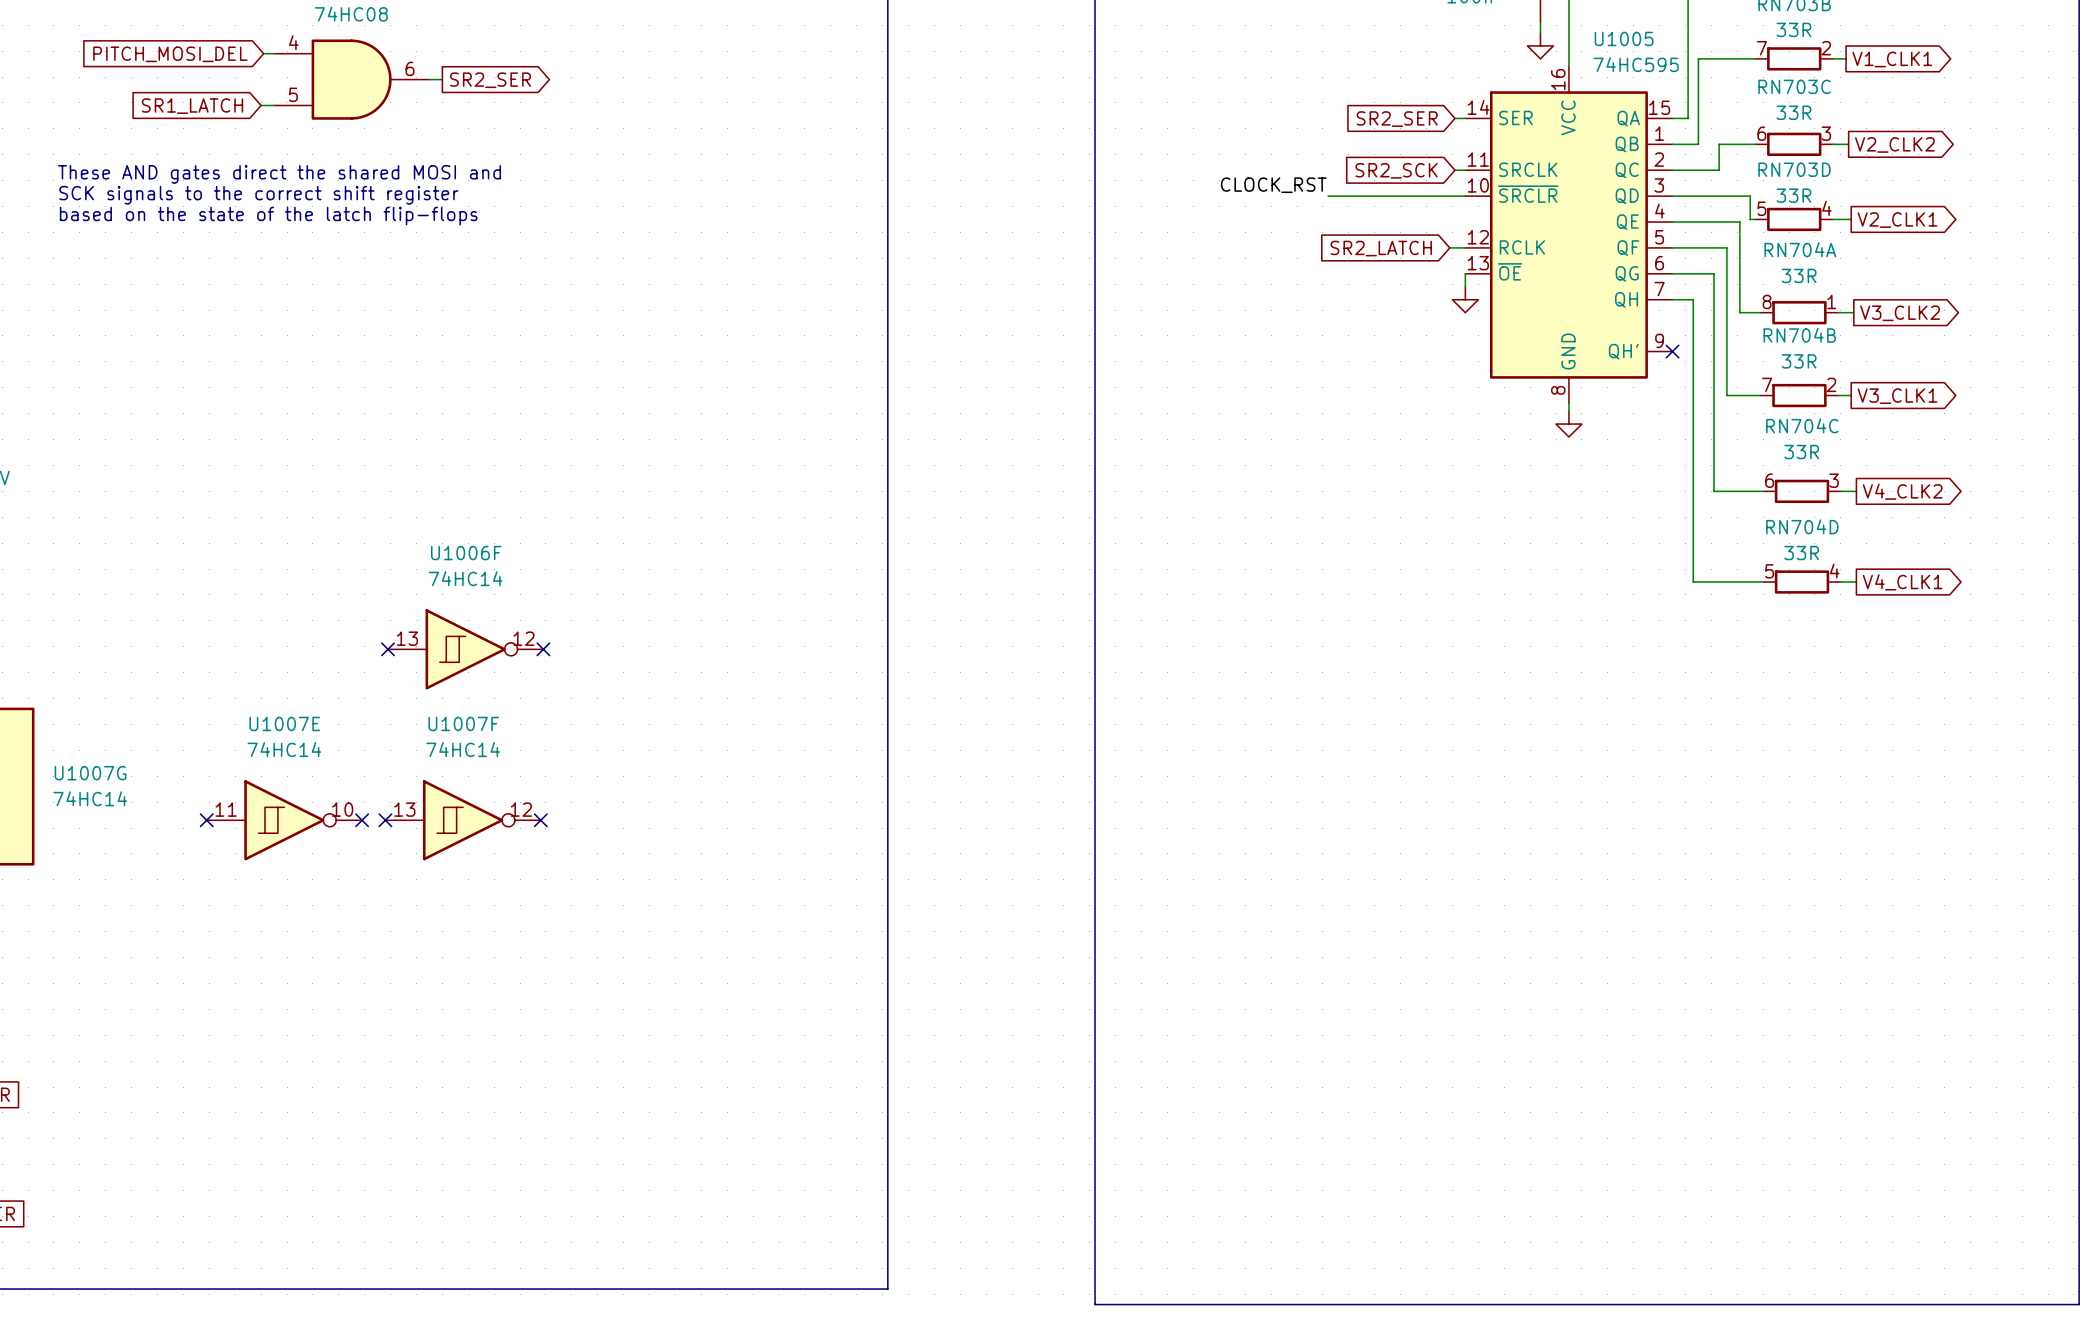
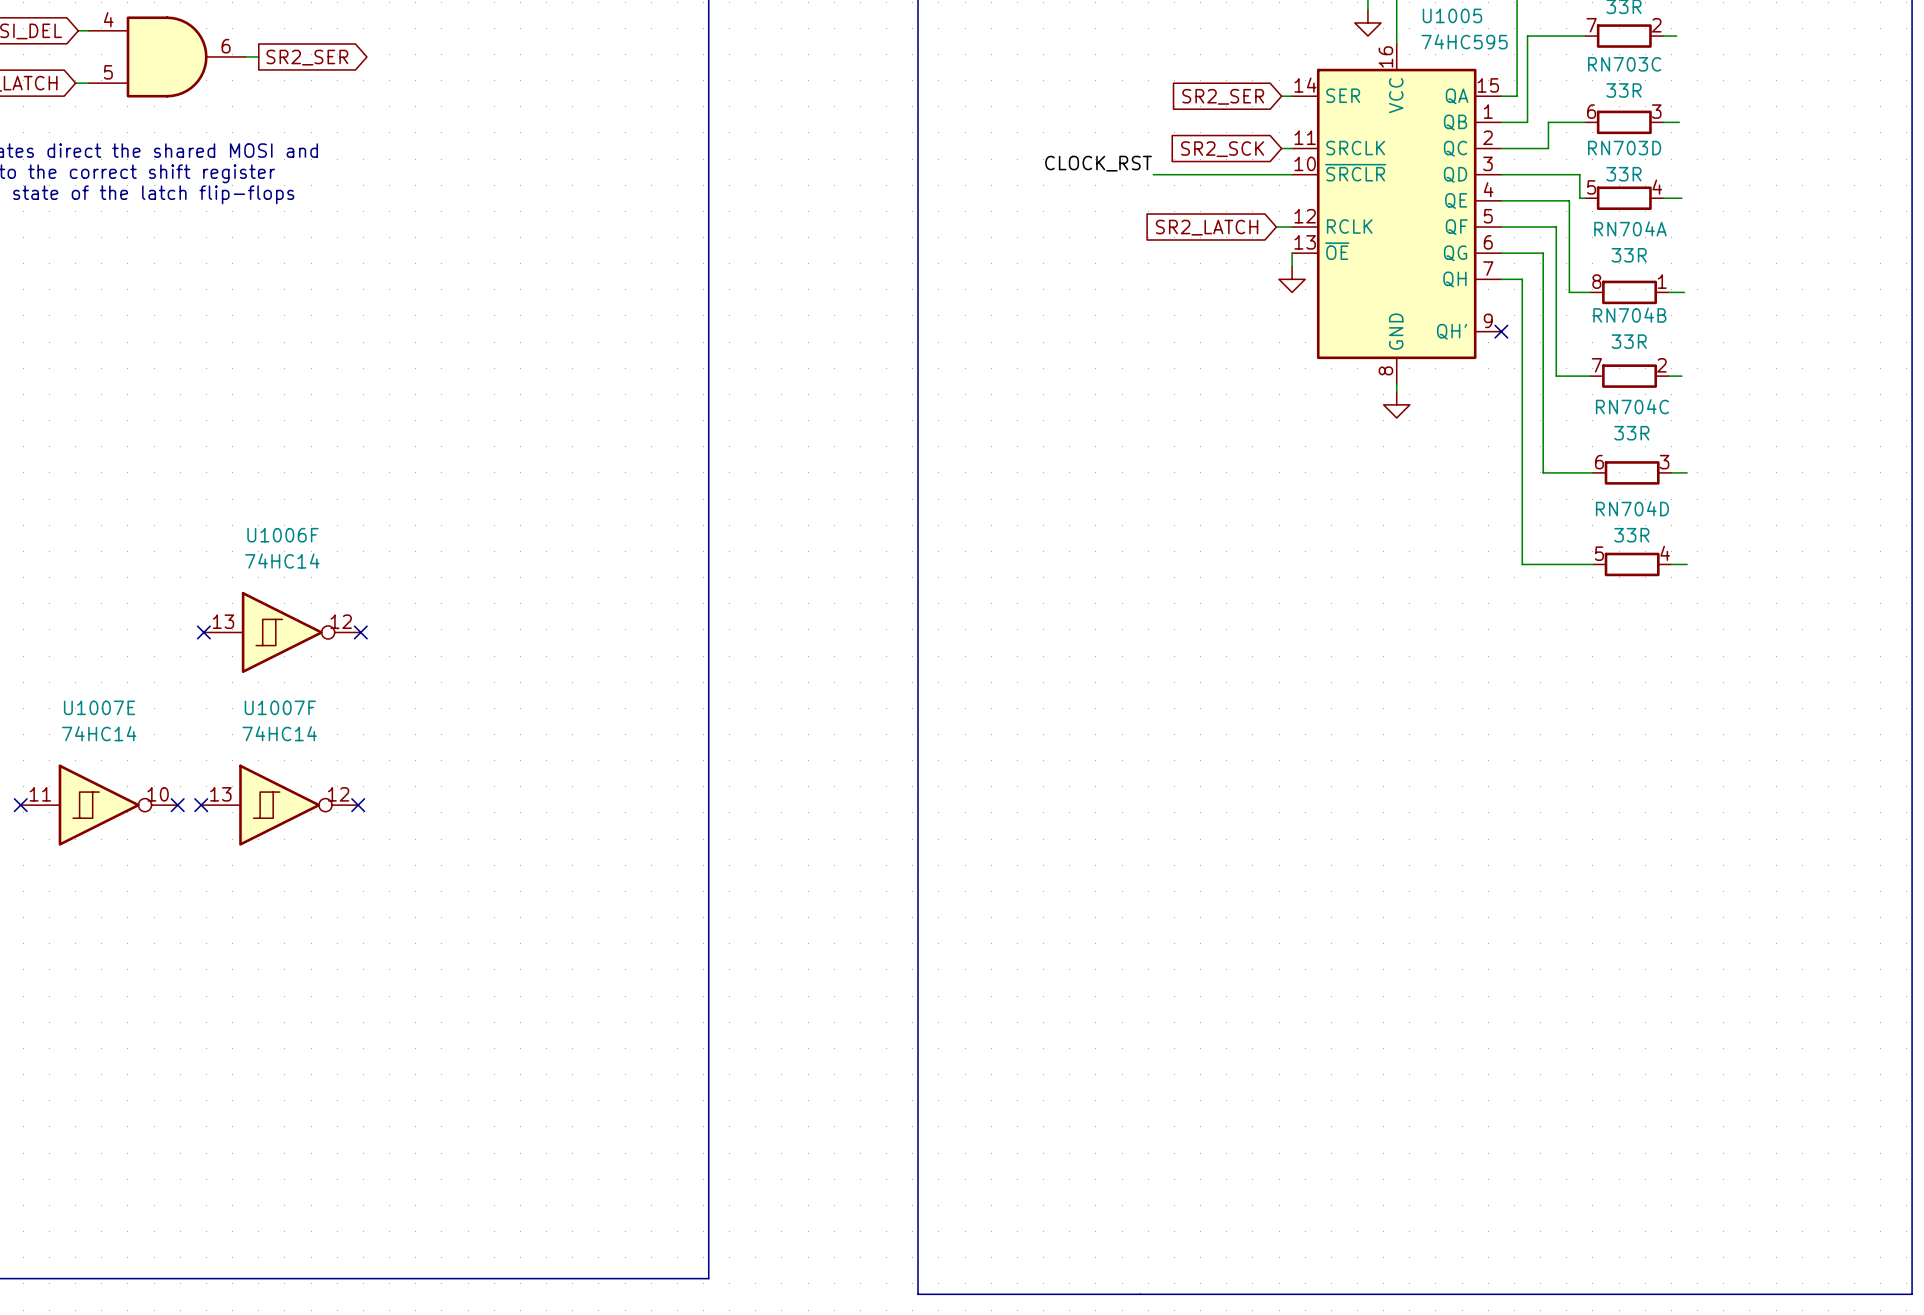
global label: V1_CLK1 (1892, 59) -> none
global label: V2_CLK2 (1894, 144) -> none
global label: V2_CLK1 (1897, 220) -> none
global label: V3_CLK2 (1900, 313) -> none
global label: V3_CLK1 (1897, 396) -> none
global label: V4_CLK2 (1902, 491) -> none
global label: V4_CLK1 (1902, 582) -> none

